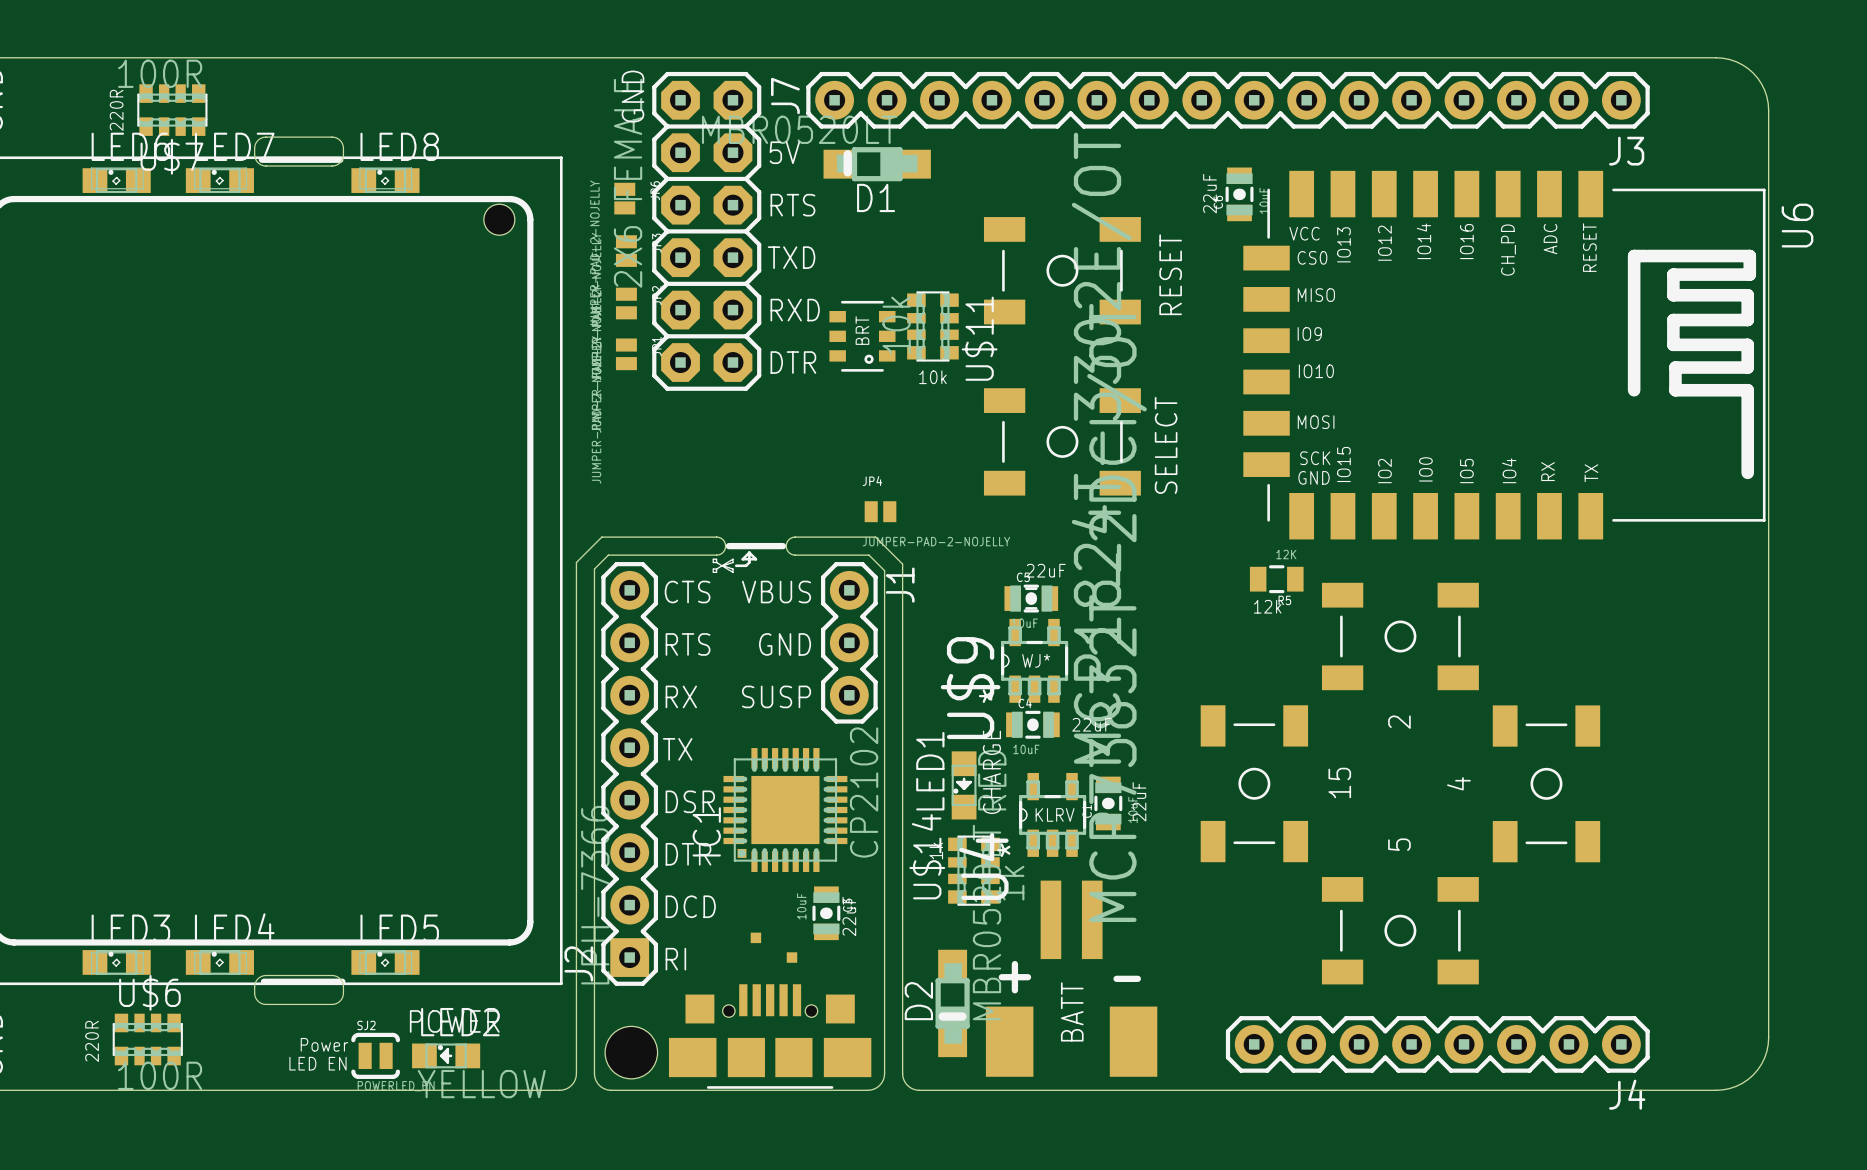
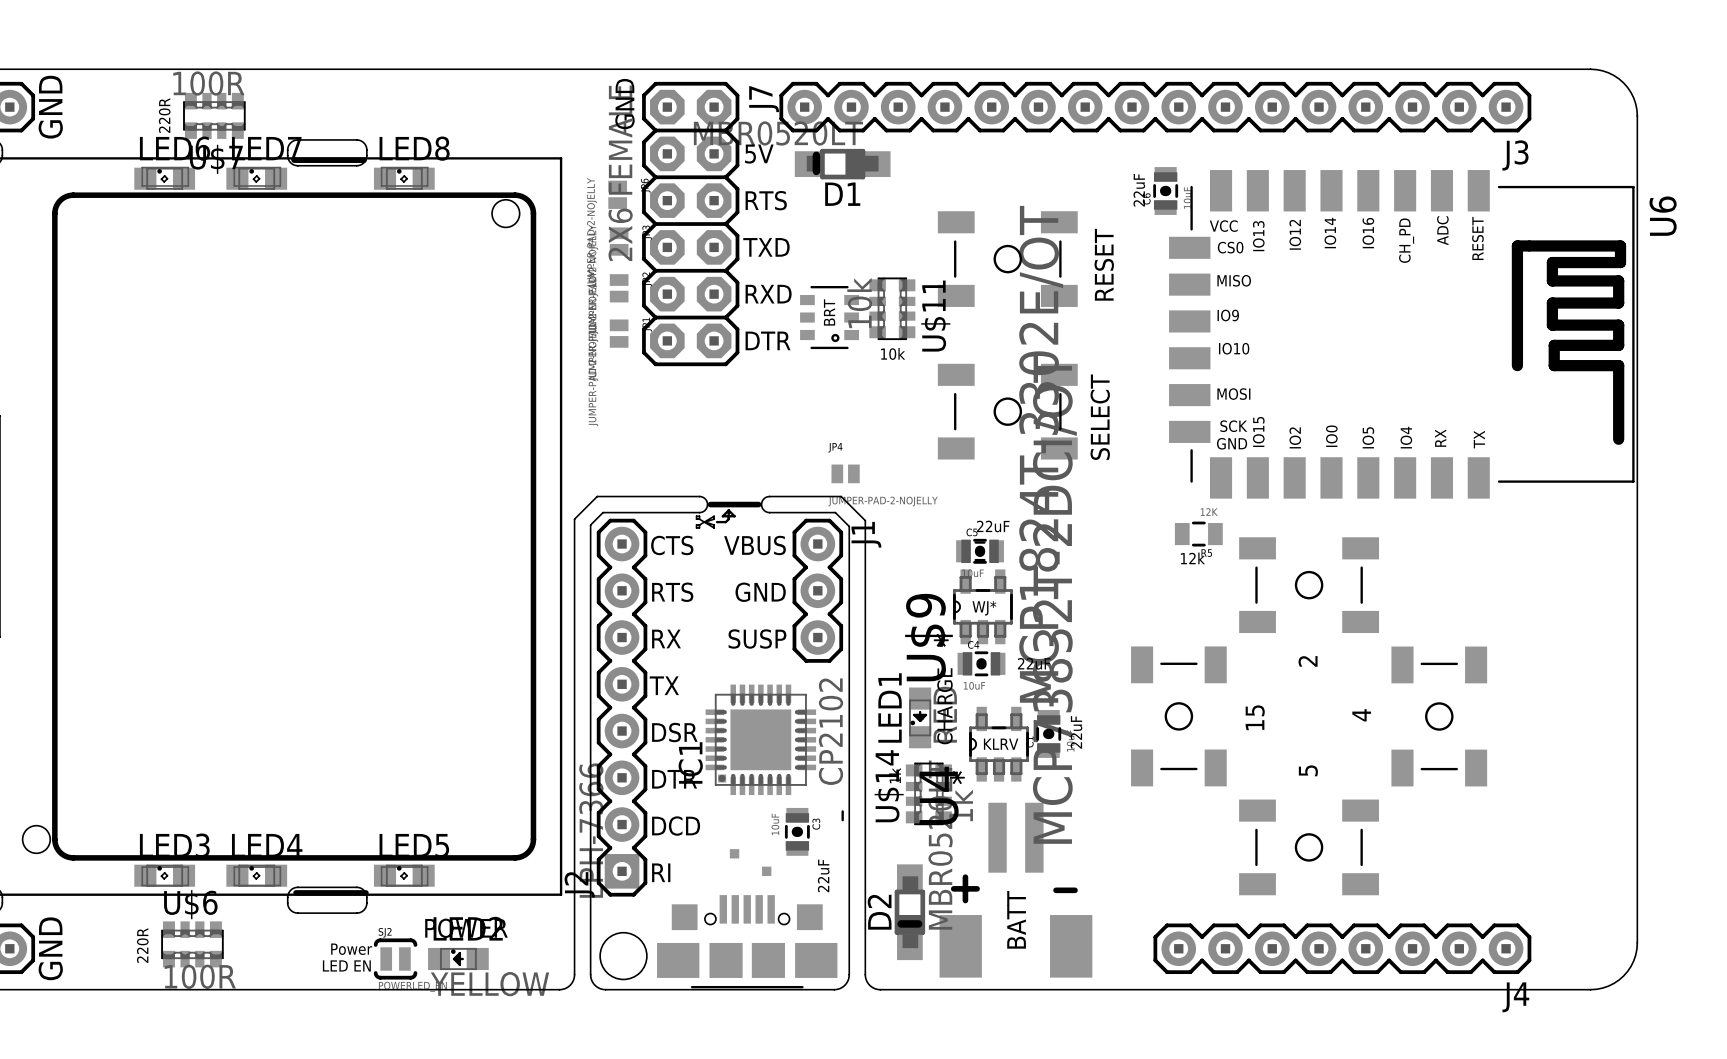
line: none -> (842, 811) (842, 820)
text position: 22uF (849, 916) -> 22uF (823, 875)

